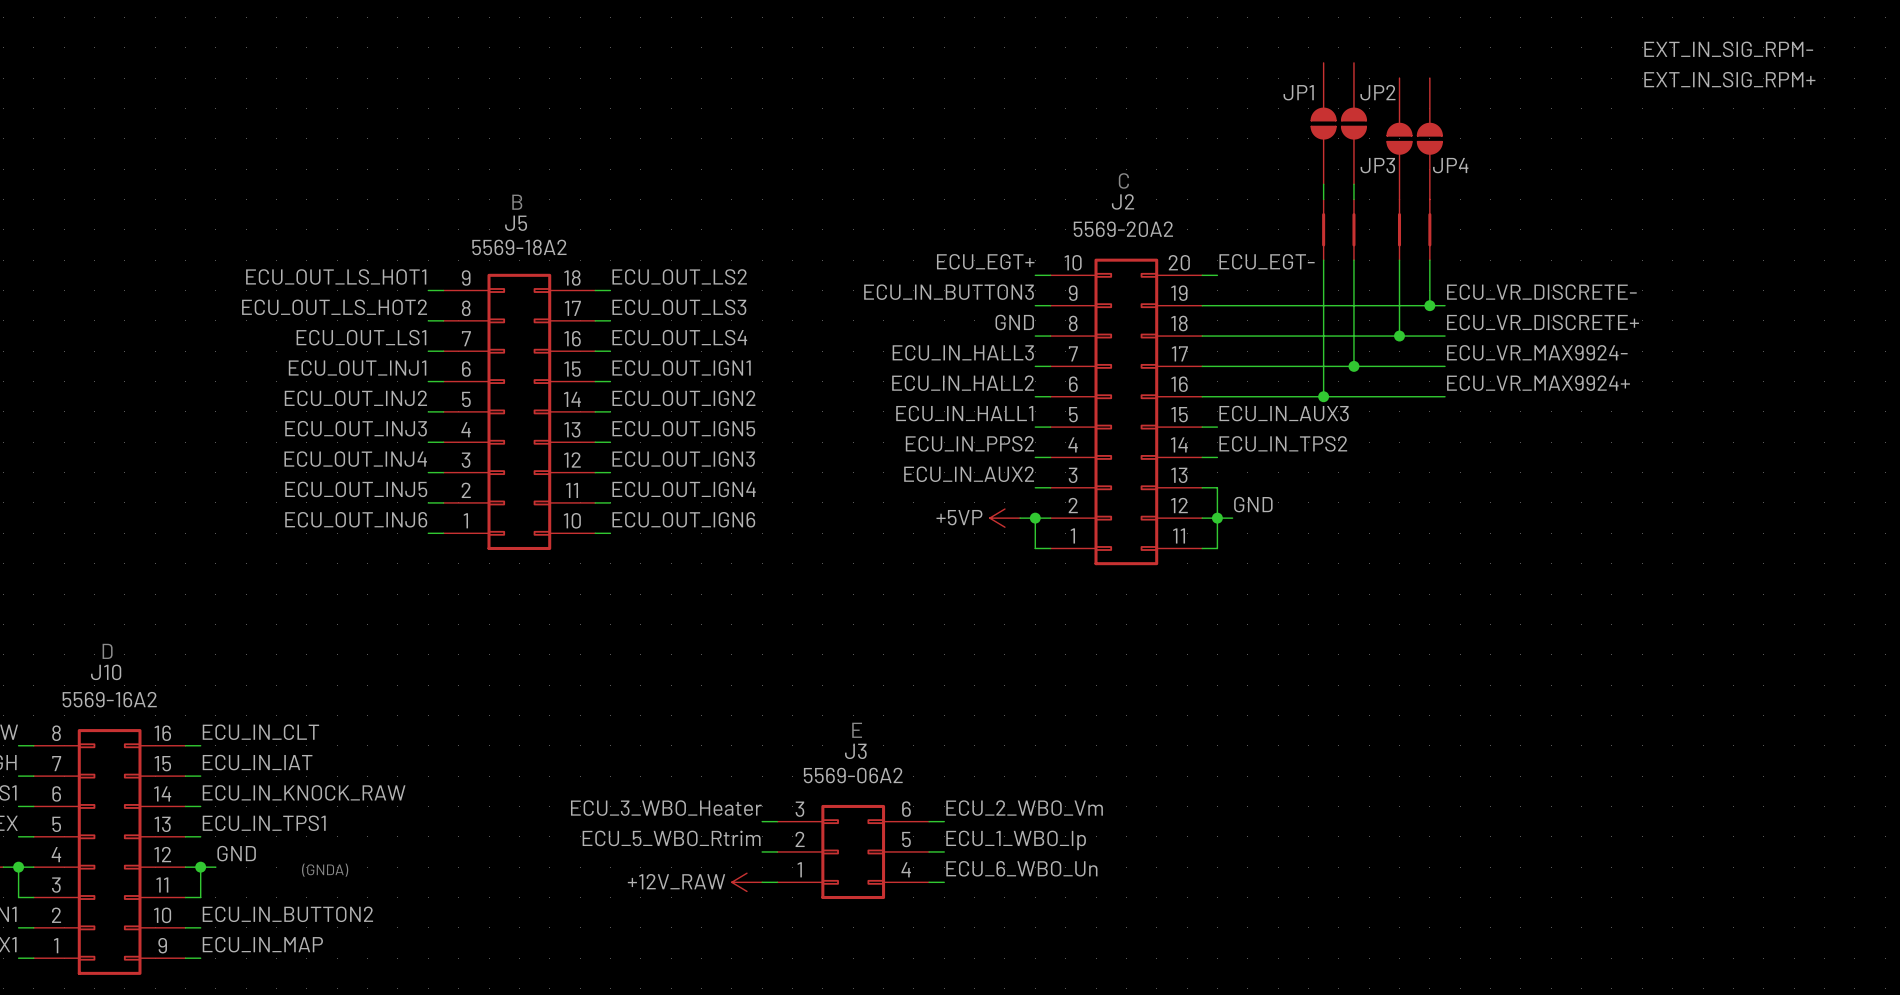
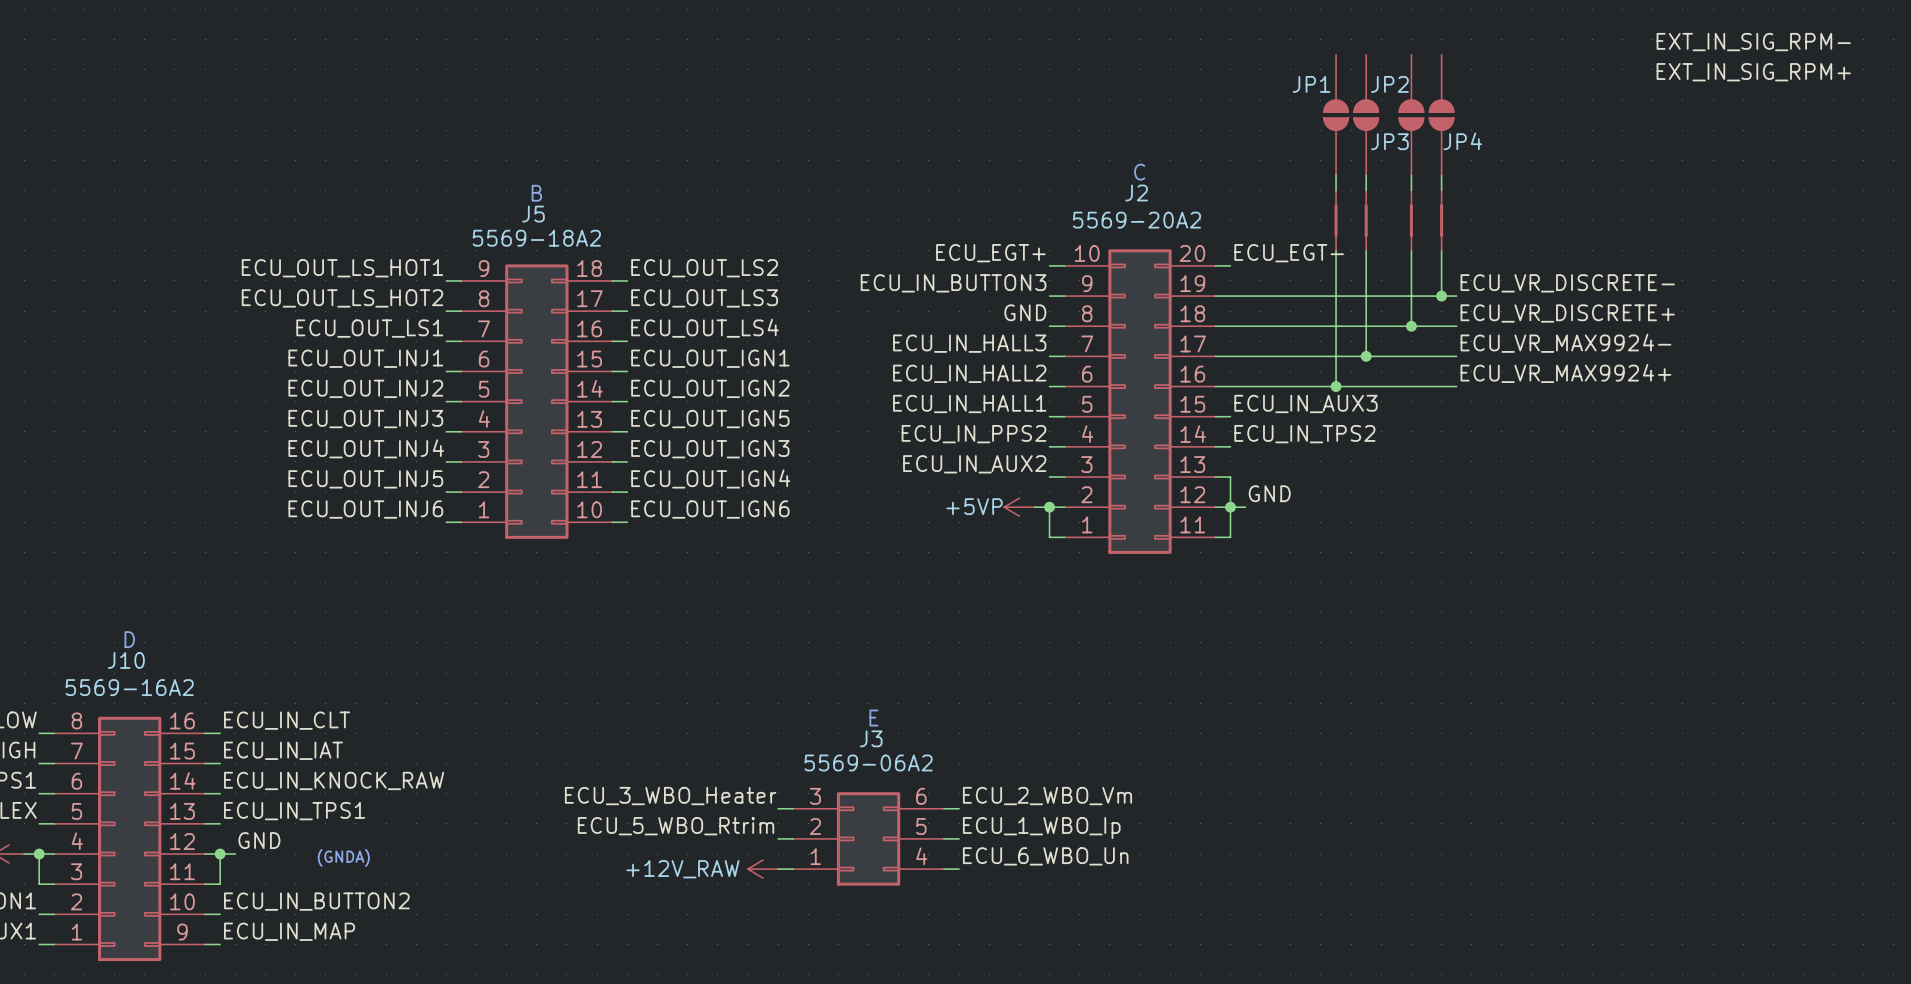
JP3 position: (1399, 138) -> (1411, 115)
JP4 position: (1429, 138) -> (1441, 115)

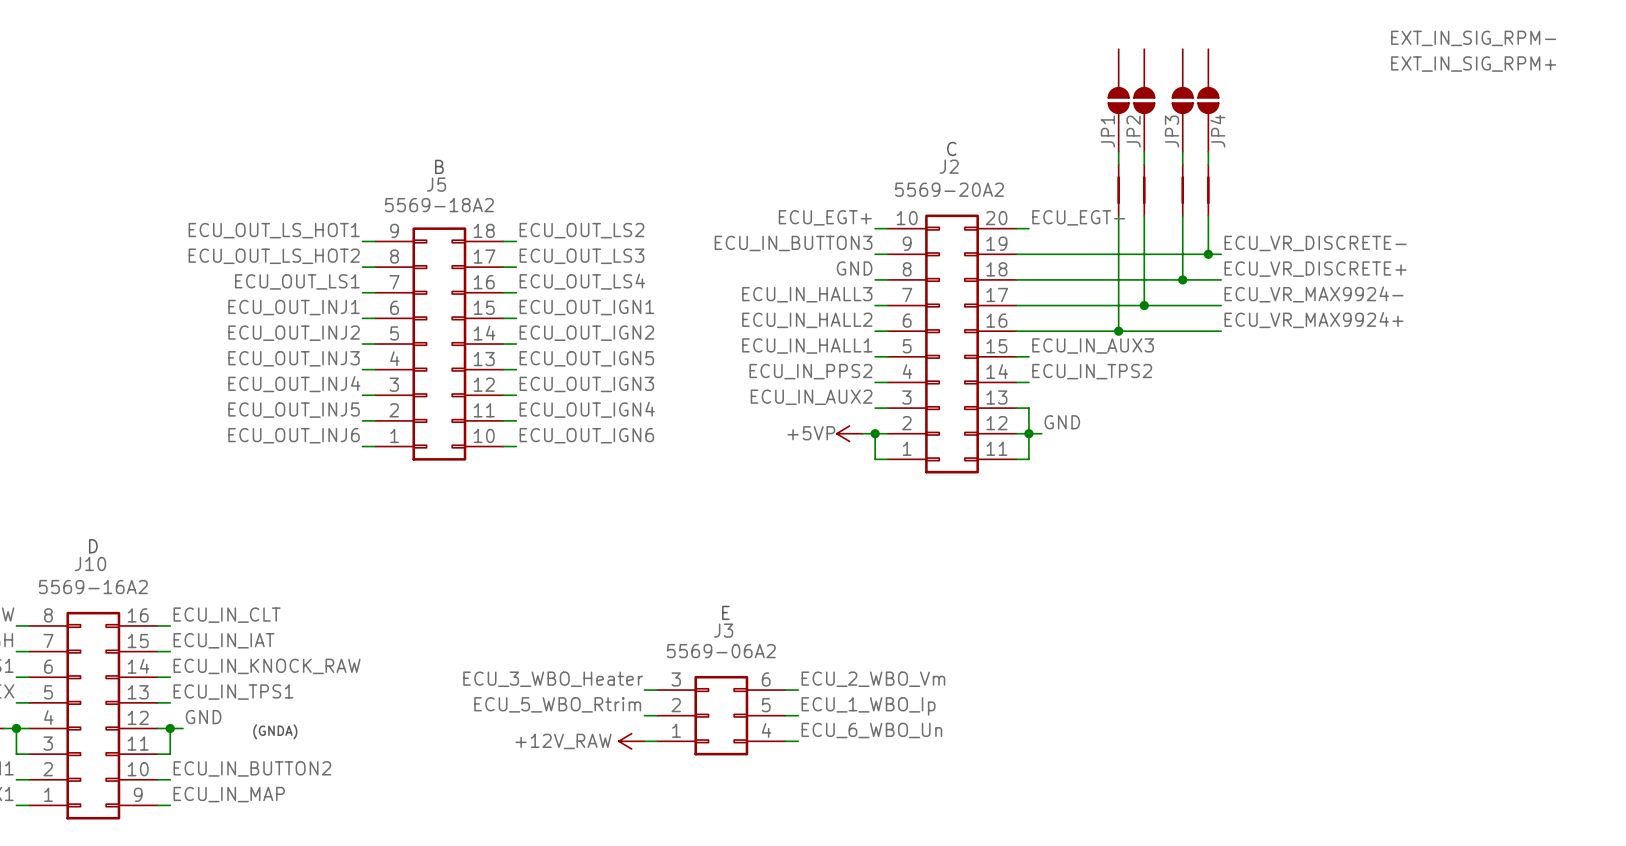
JP1 name rotation: 0° (1311, 84) -> 90° counterclockwise (1107, 131)
JP1 name position: JP1 (1311, 84) -> JP1 (1107, 131)
JP2 name rotation: 0° (1389, 84) -> 90° counterclockwise (1133, 131)
JP2 name position: JP2 (1389, 84) -> JP2 (1133, 131)
JP3 name rotation: 0° (1389, 141) -> 90° counterclockwise (1172, 131)
JP4 name rotation: 0° (1462, 141) -> 90° counterclockwise (1217, 131)

